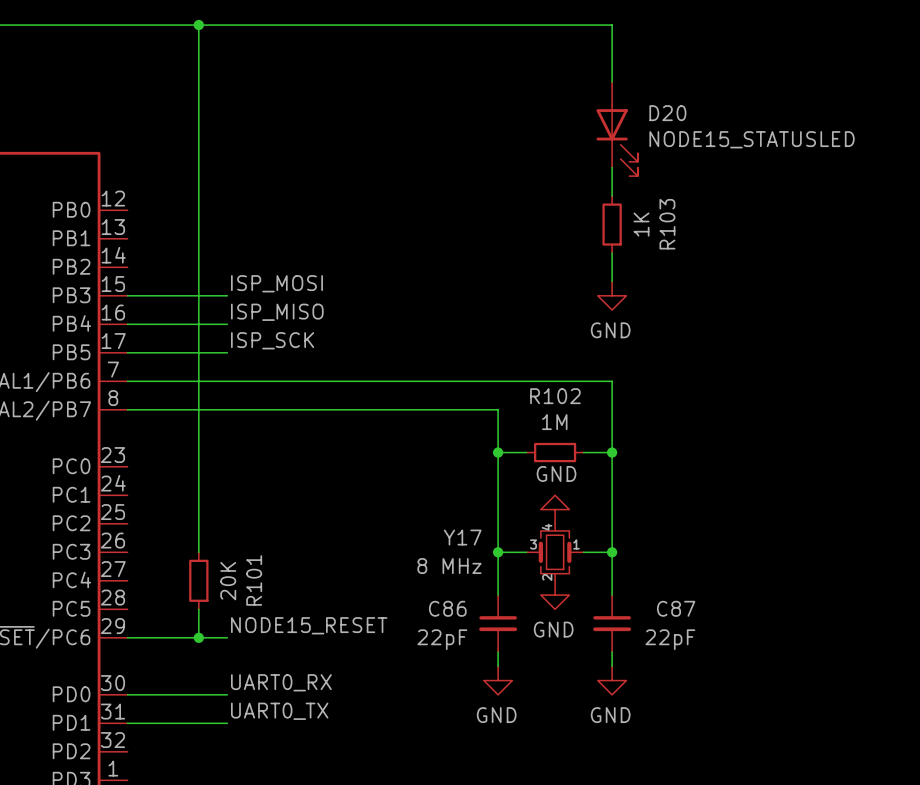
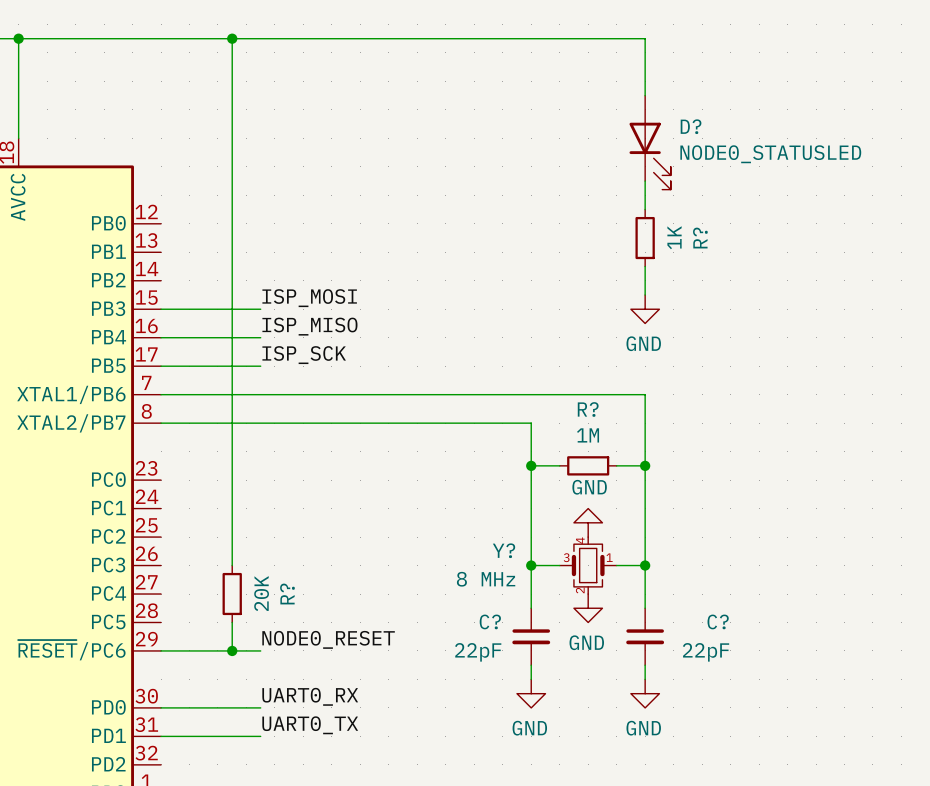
D20 name: D20 (667, 113) -> D? (691, 126)
D20 value: NODE15_STATUSLED (752, 139) -> NODE0_STATUSLED (770, 154)
R103 name: R103 (667, 224) -> R? (700, 238)
R102 name: R102 (555, 396) -> R? (588, 409)
Y17 name: Y17 (462, 537) -> Y? (504, 550)
R101 name: R101 (254, 580) -> R? (287, 594)
C86 name: C86 (447, 608) -> C? (490, 621)
C87 name: C87 (676, 608) -> C? (718, 621)
label: NODE15_RESET (309, 625) -> NODE0_RESET (328, 639)

